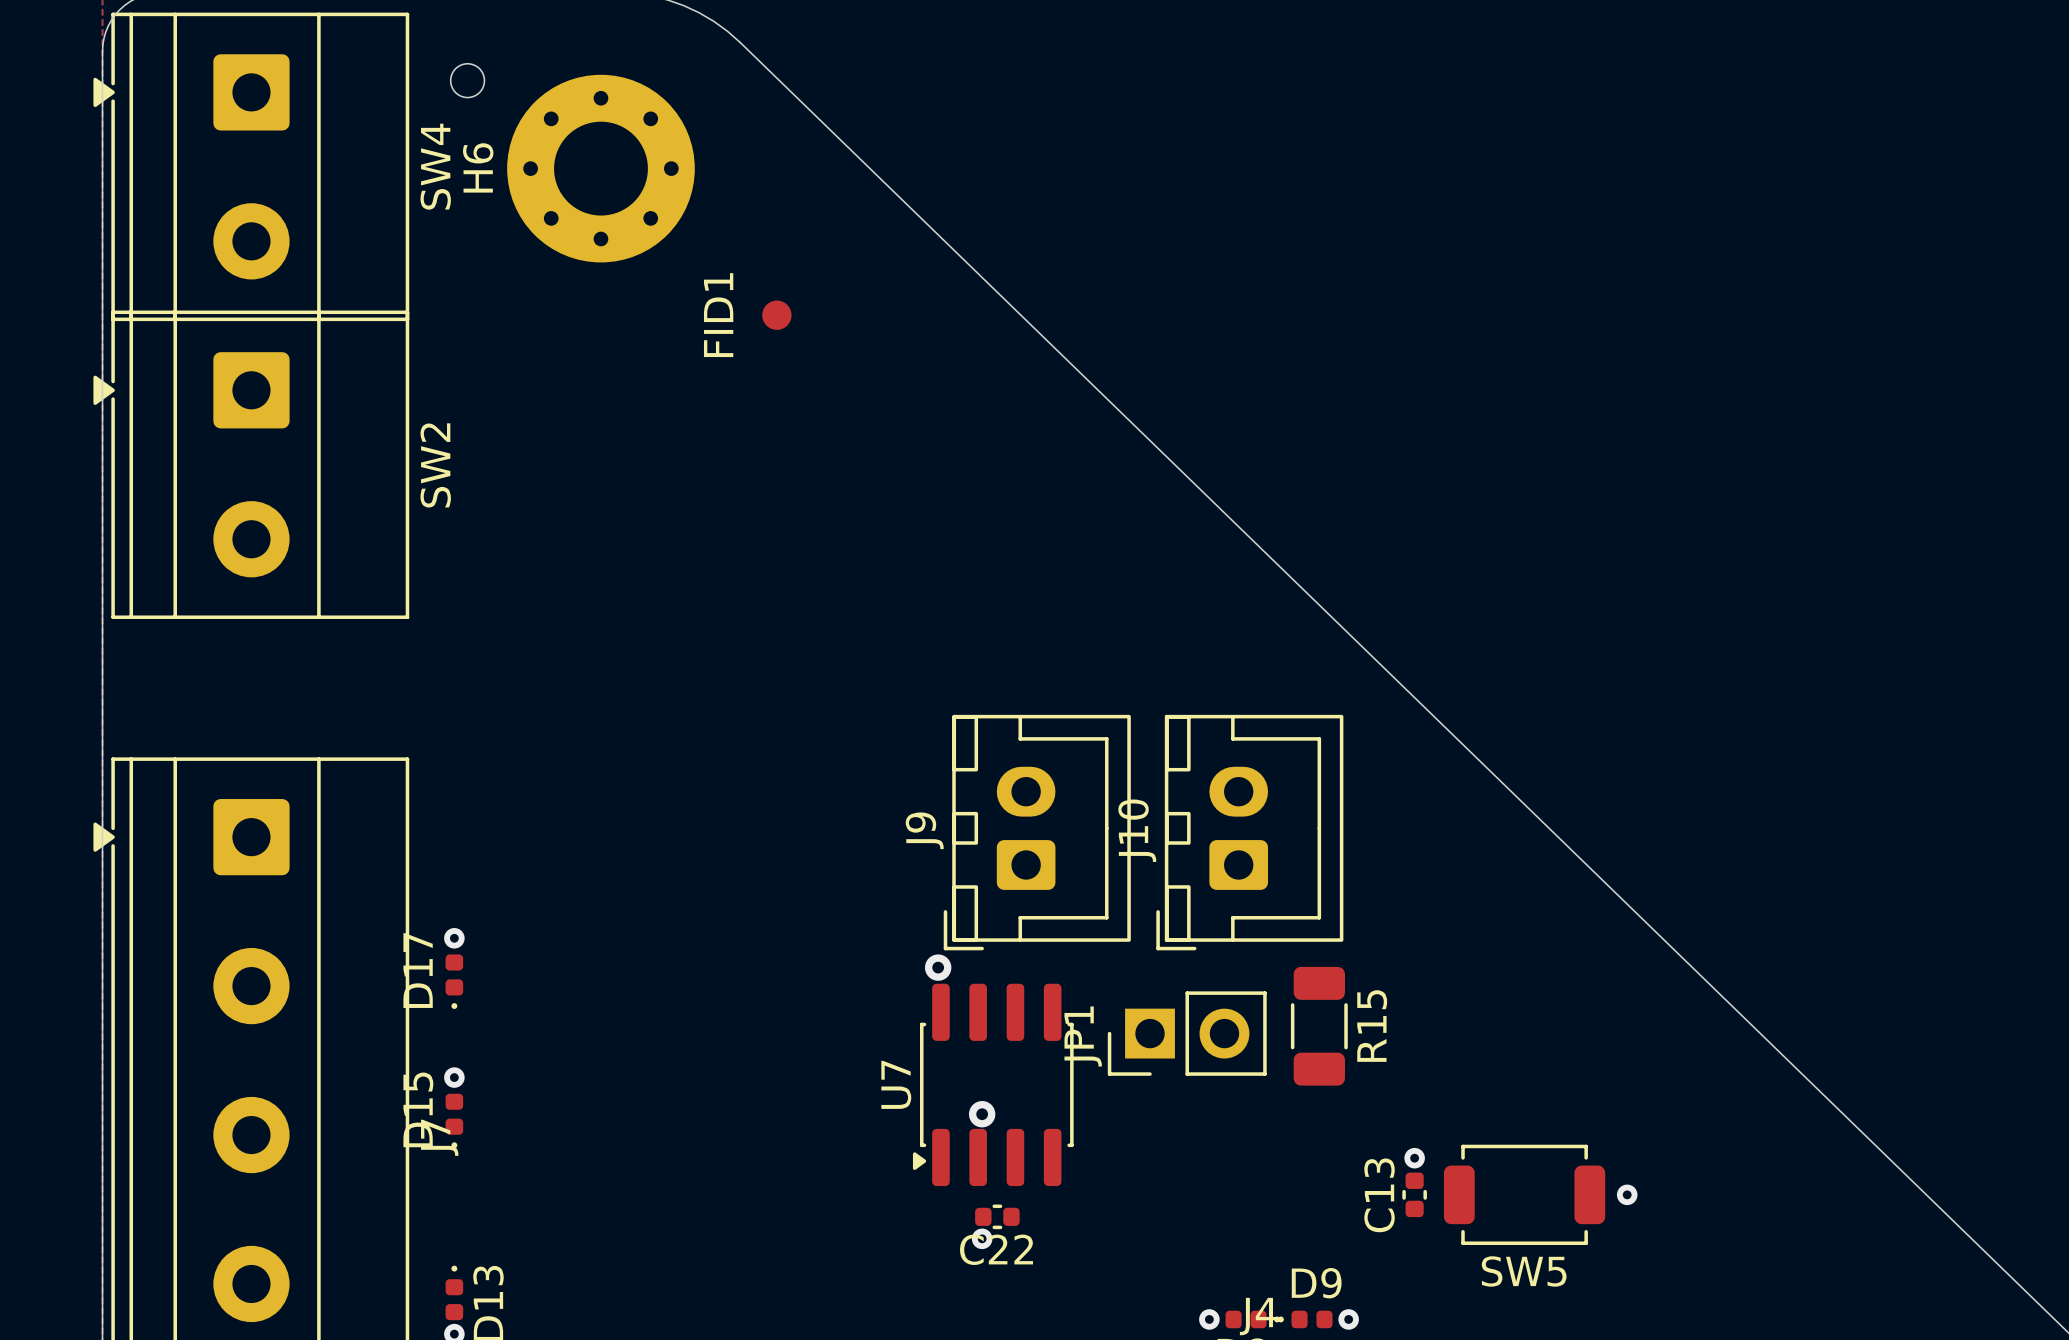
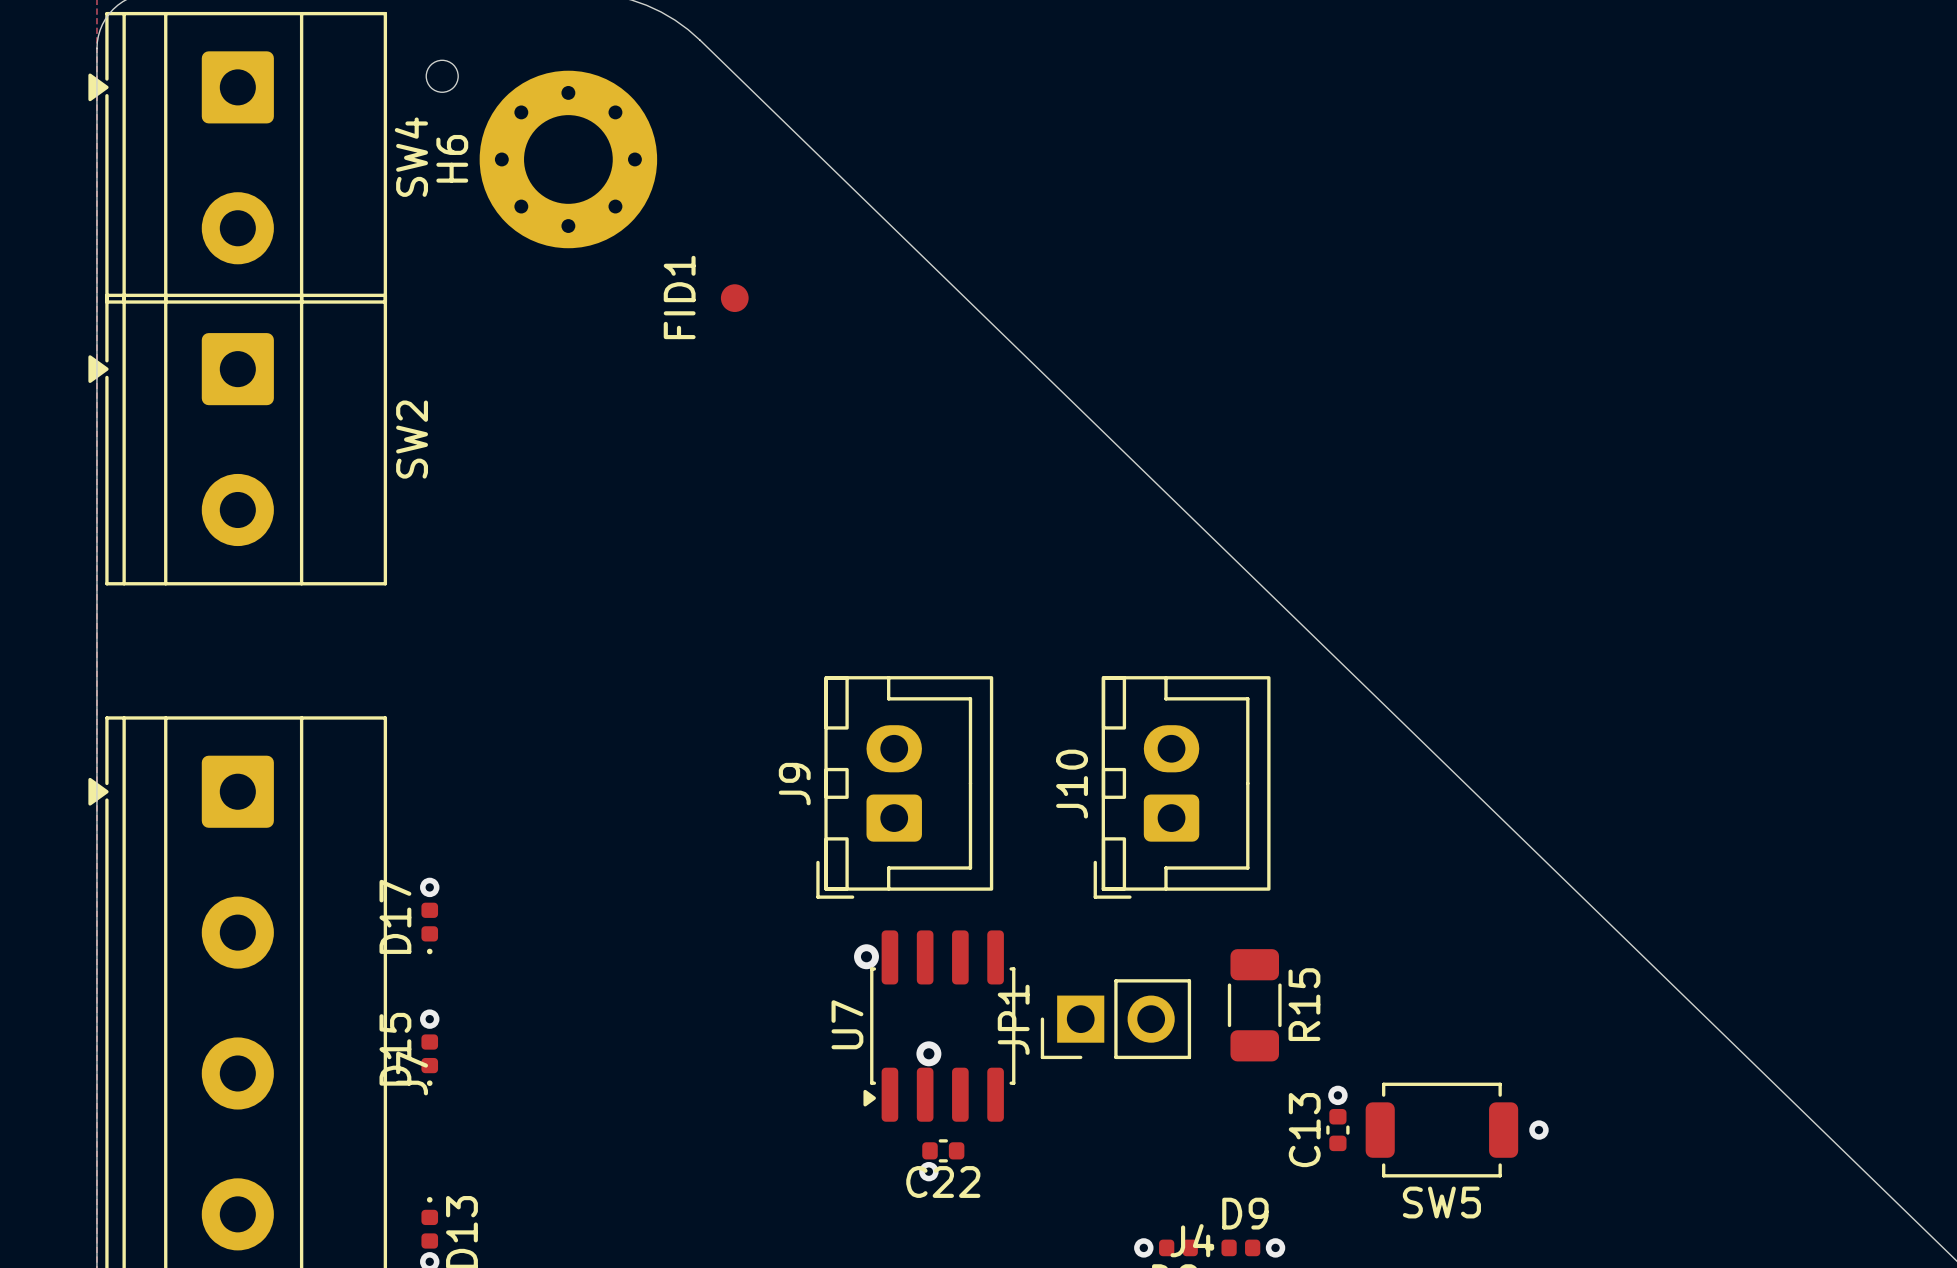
J9 position: (1037, 832) -> (904, 787)
via position: (938, 967) -> (866, 956)
R15 position: (1319, 1026) -> (1254, 1005)
JP1 position: (1187, 1033) -> (1115, 1019)

